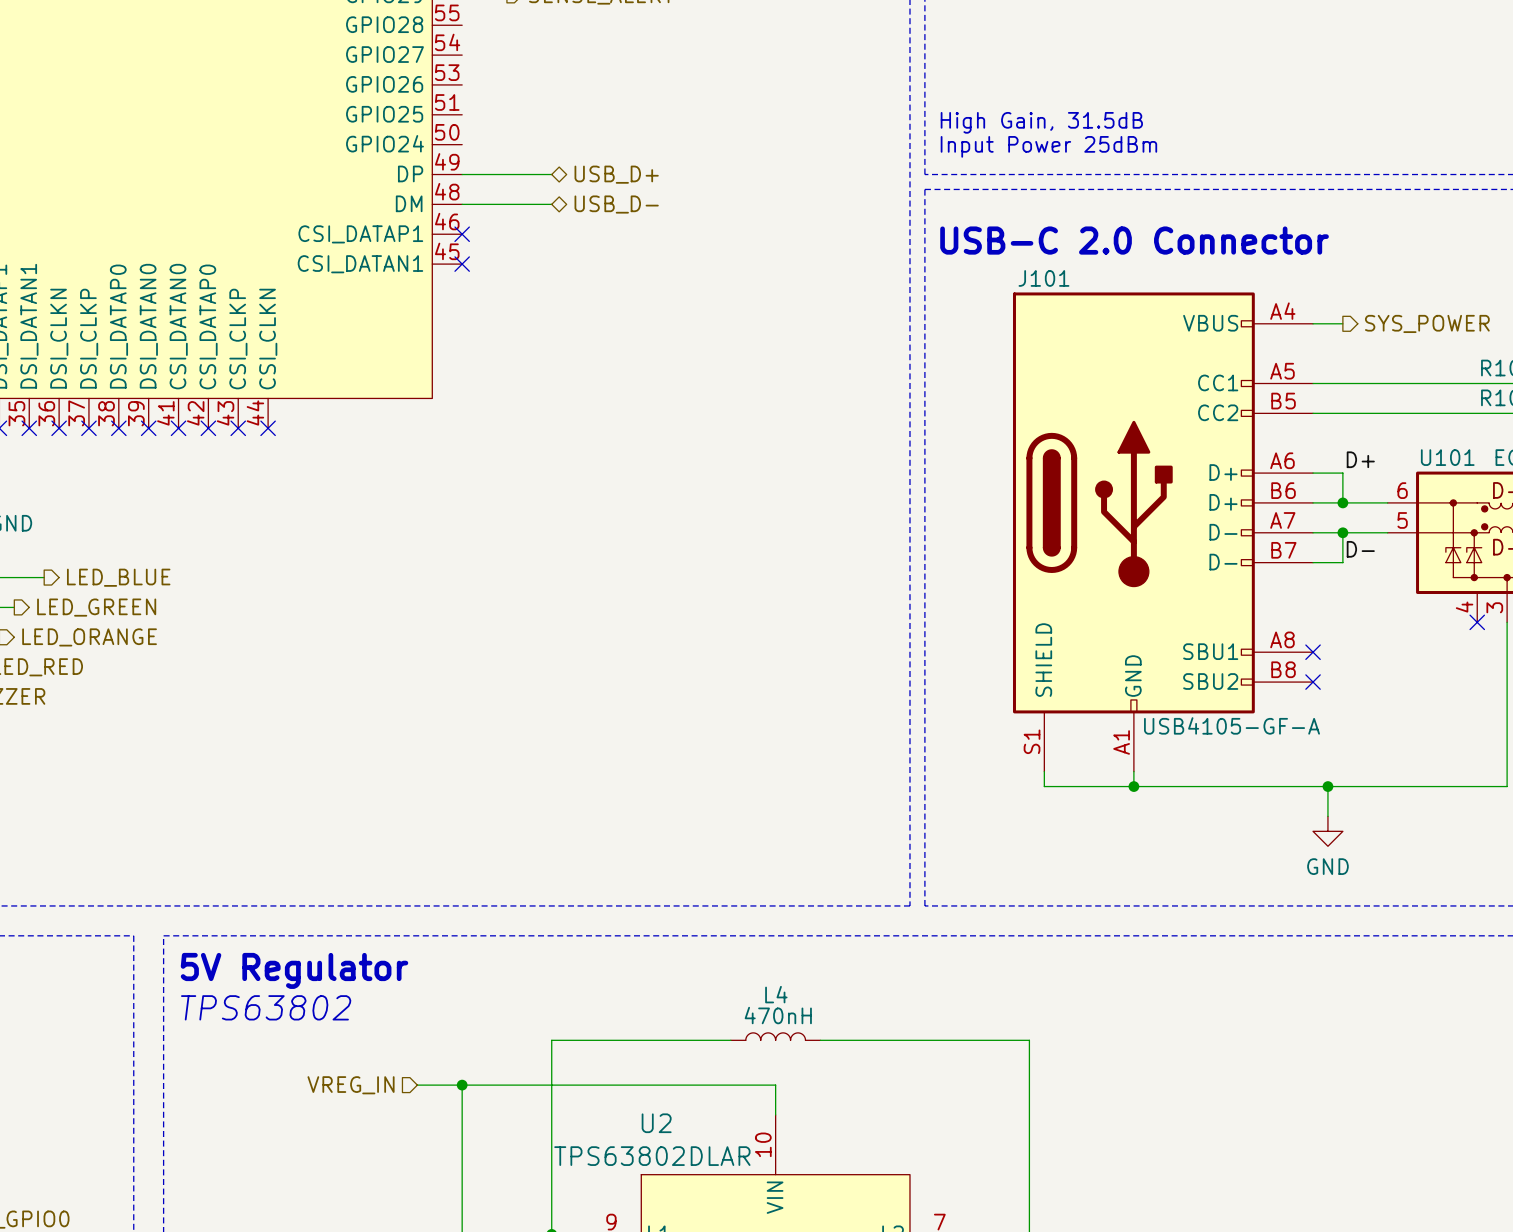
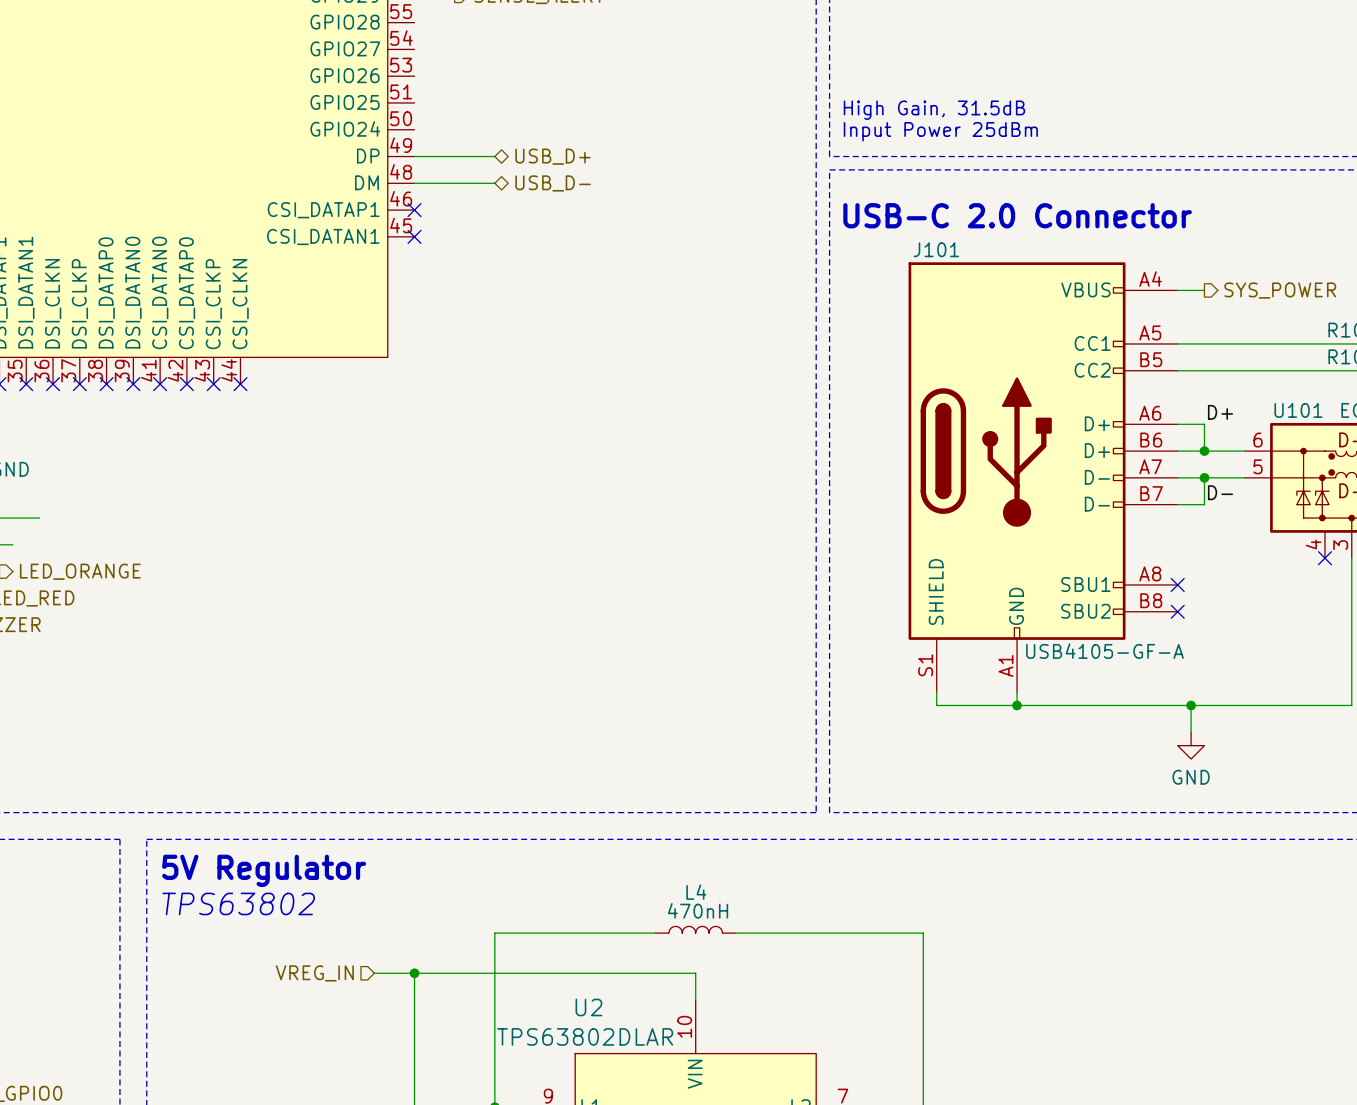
hierarchical label: LED_BLUE (118, 577) -> none
hierarchical label: LED_GREEN (96, 607) -> none

